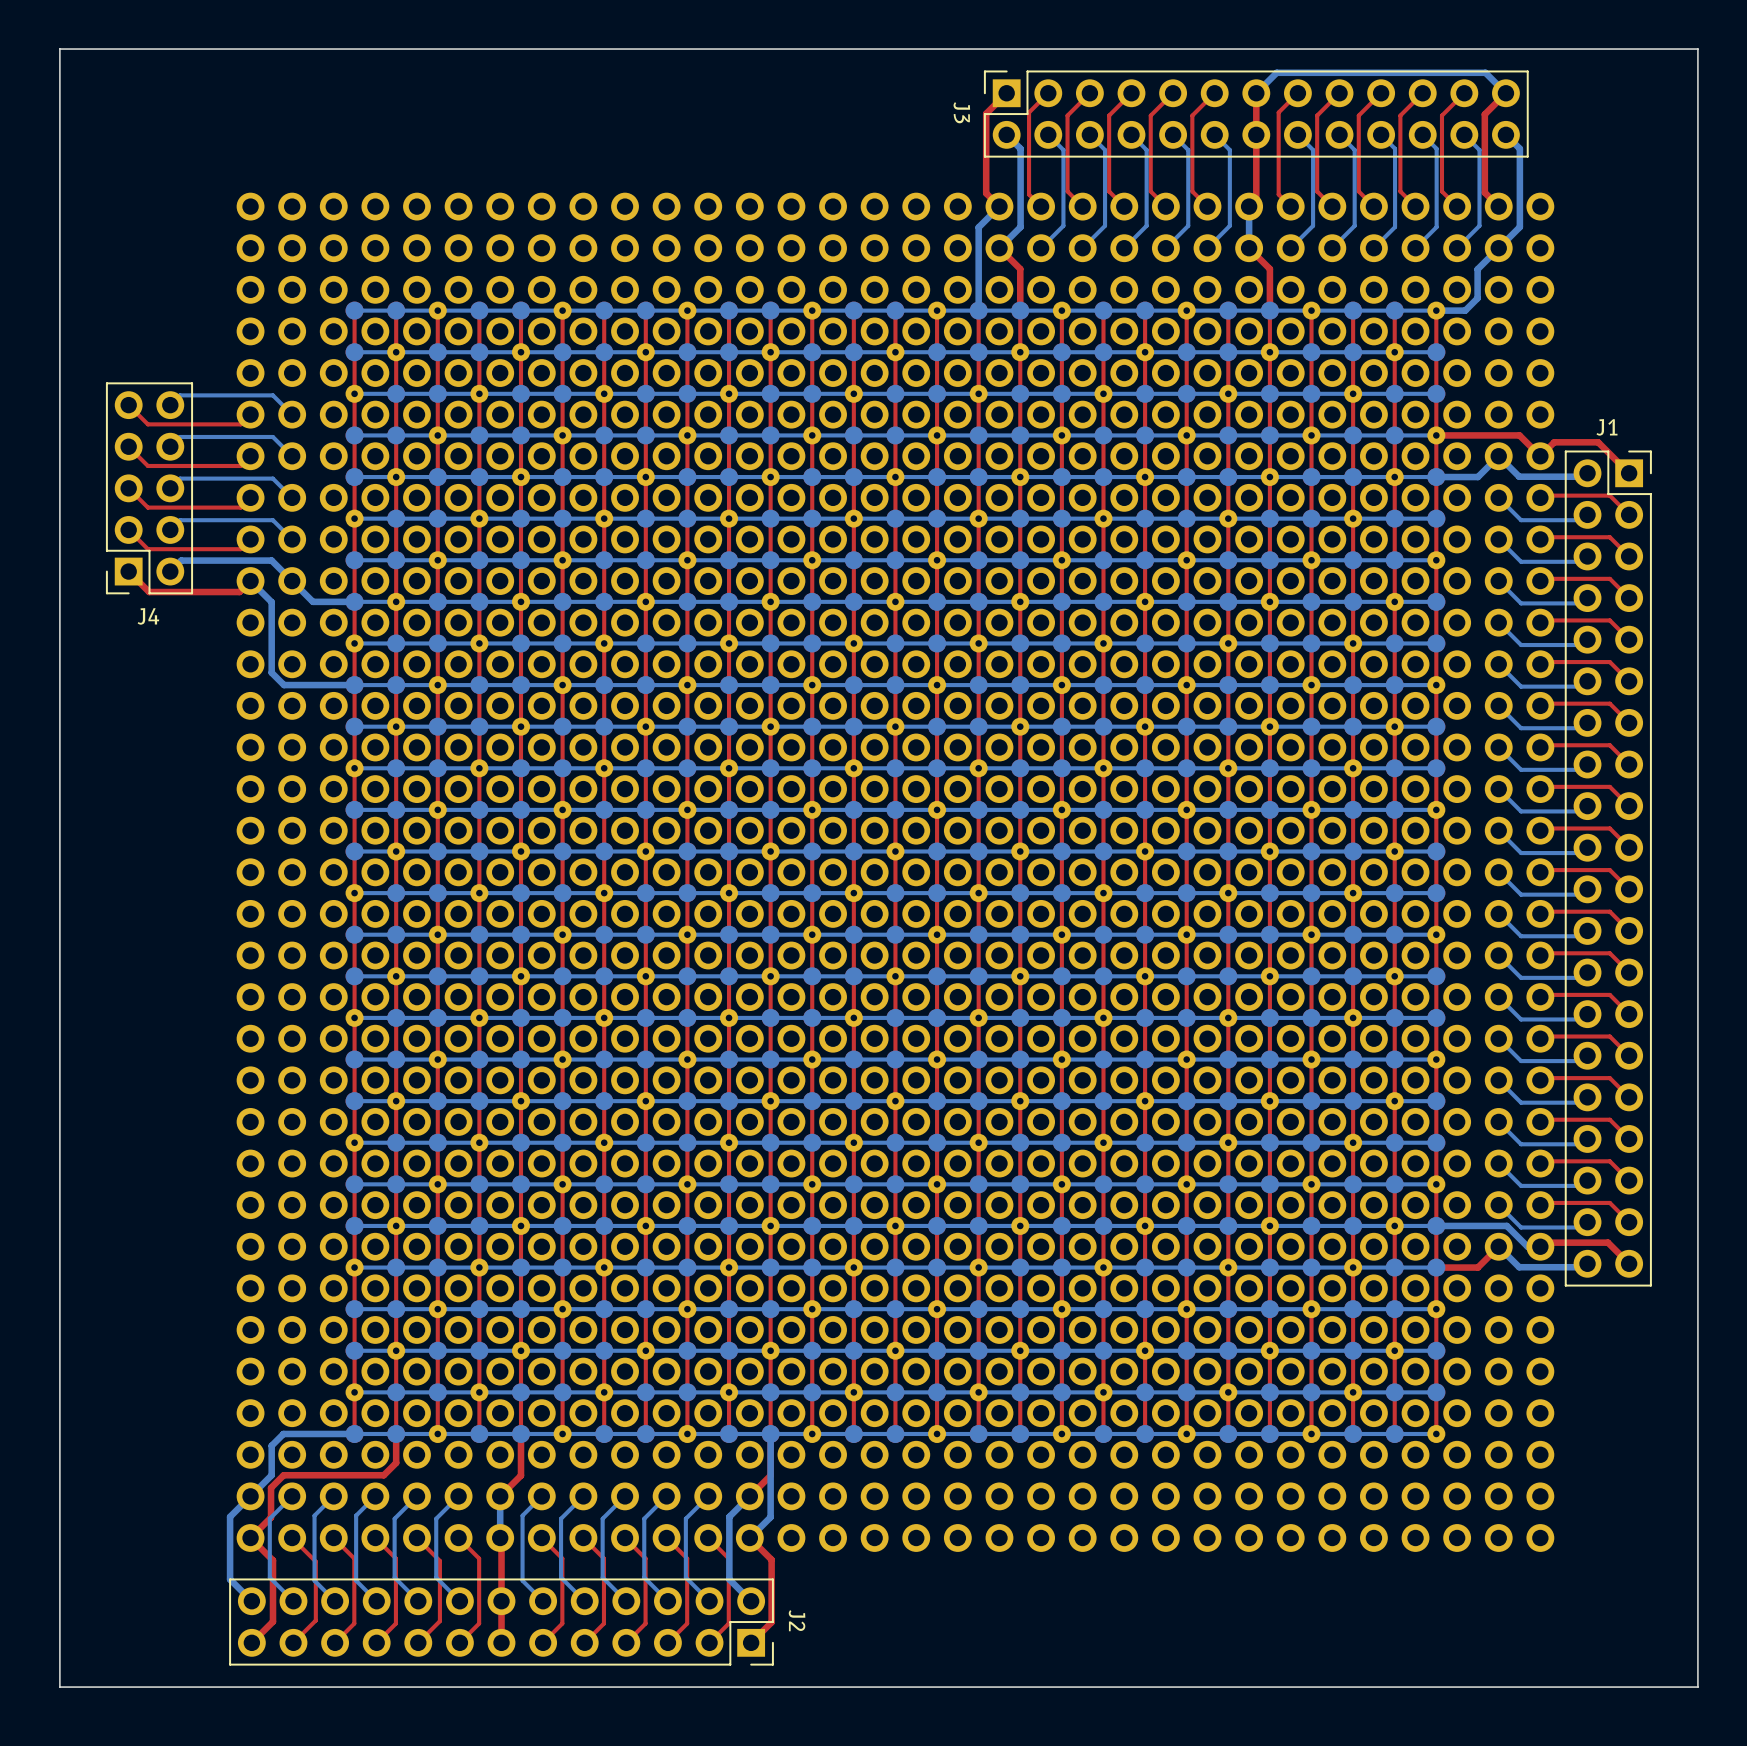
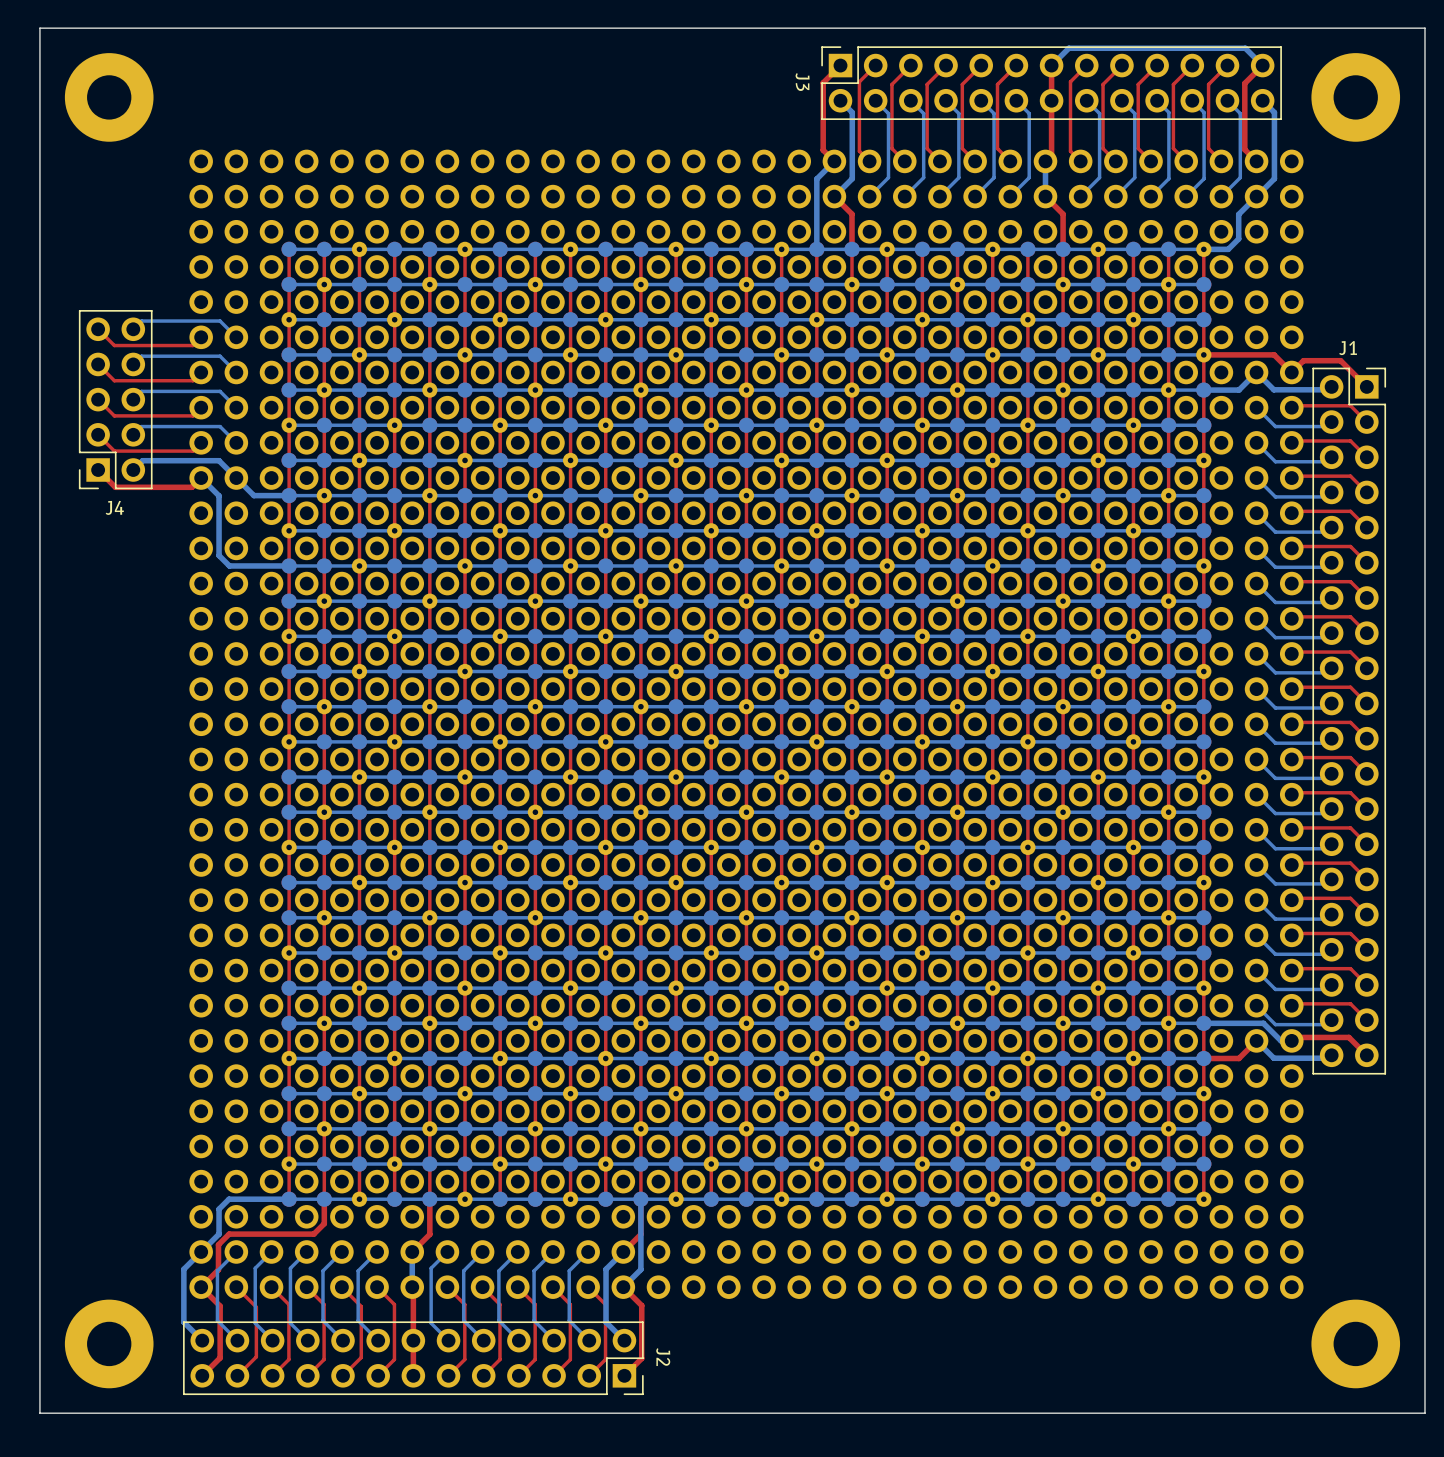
part: none -> (109, 97)
part: none -> (1355, 97)
part: none -> (109, 1343)
part: none -> (1355, 1343)

